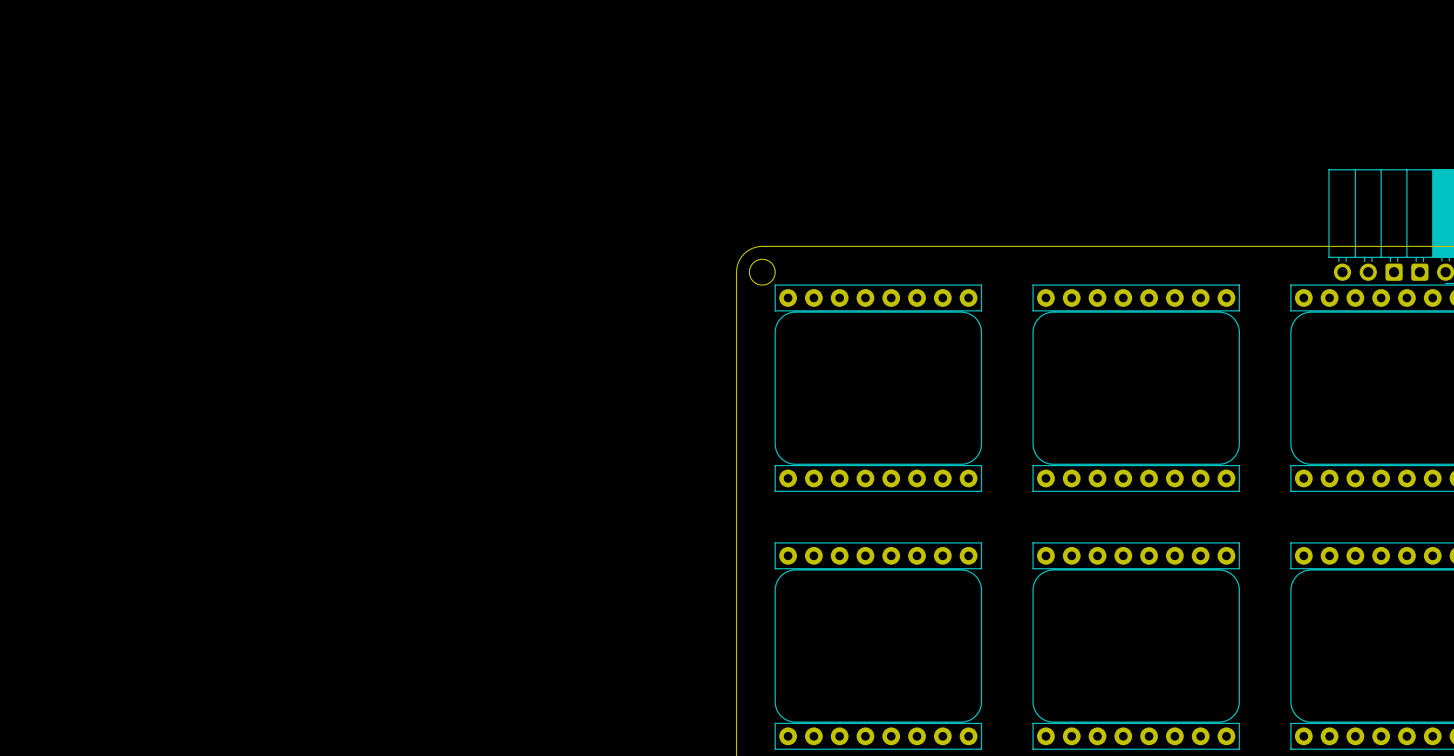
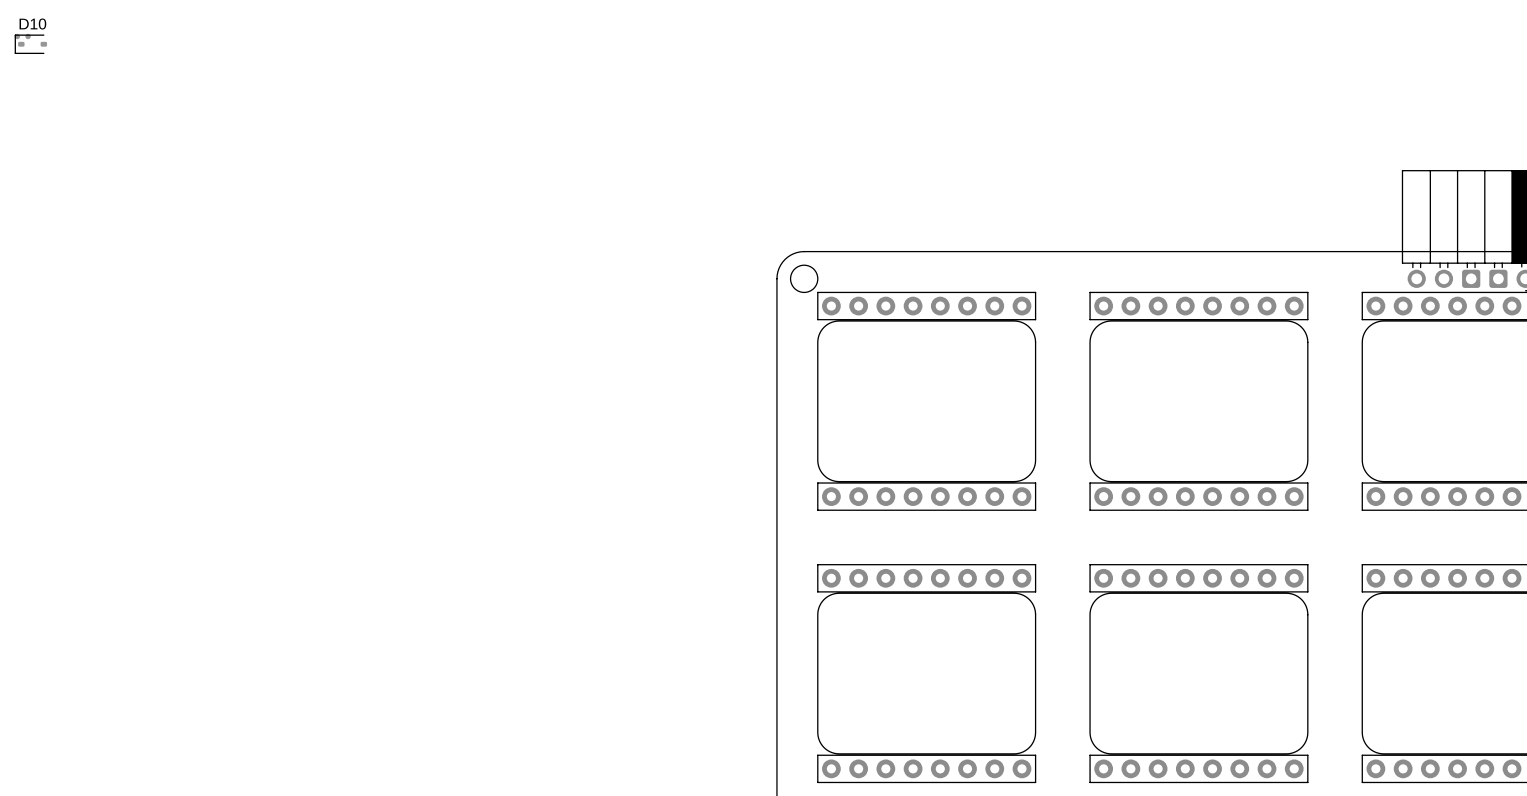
part: none -> (22, 36)
D10: none -> (30, 44)

